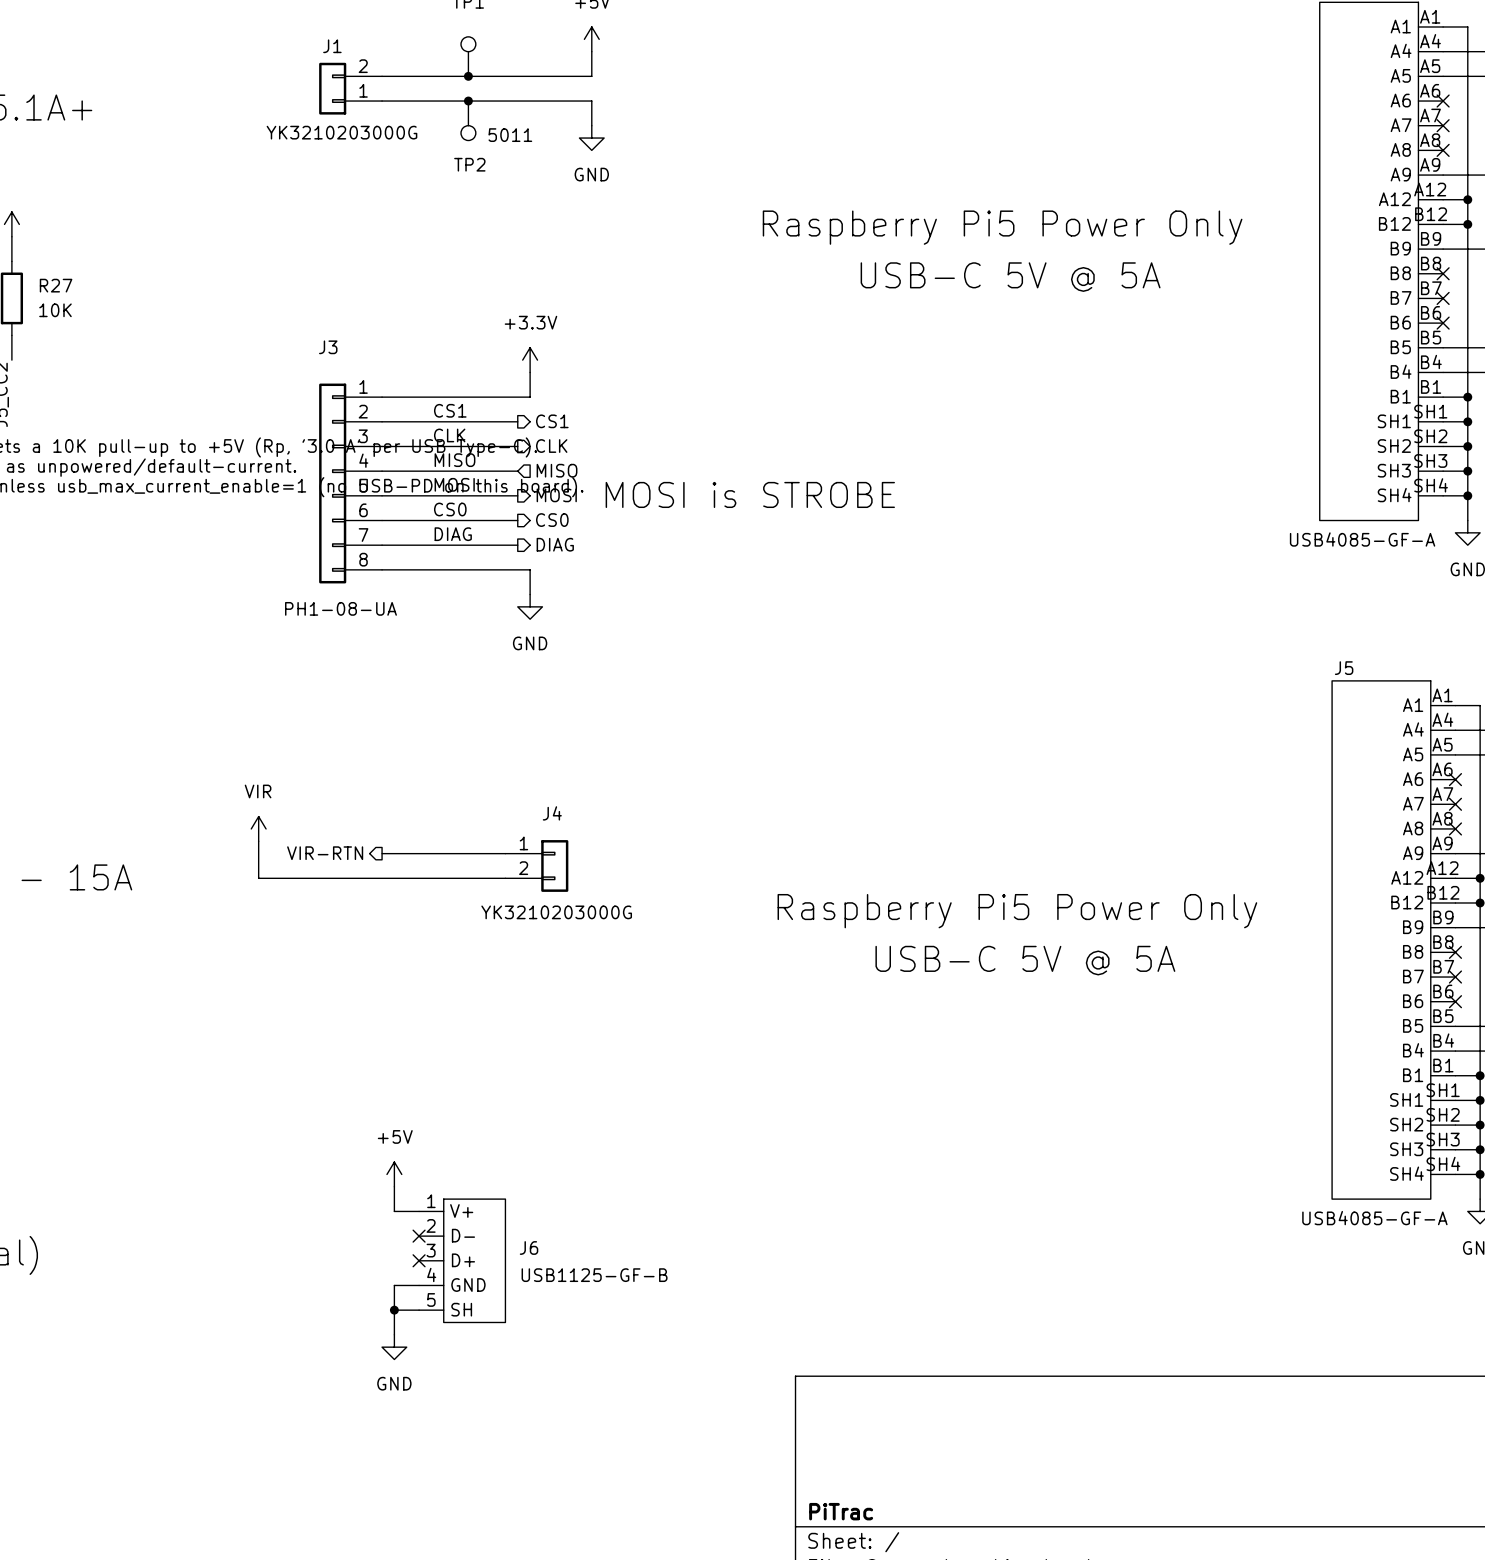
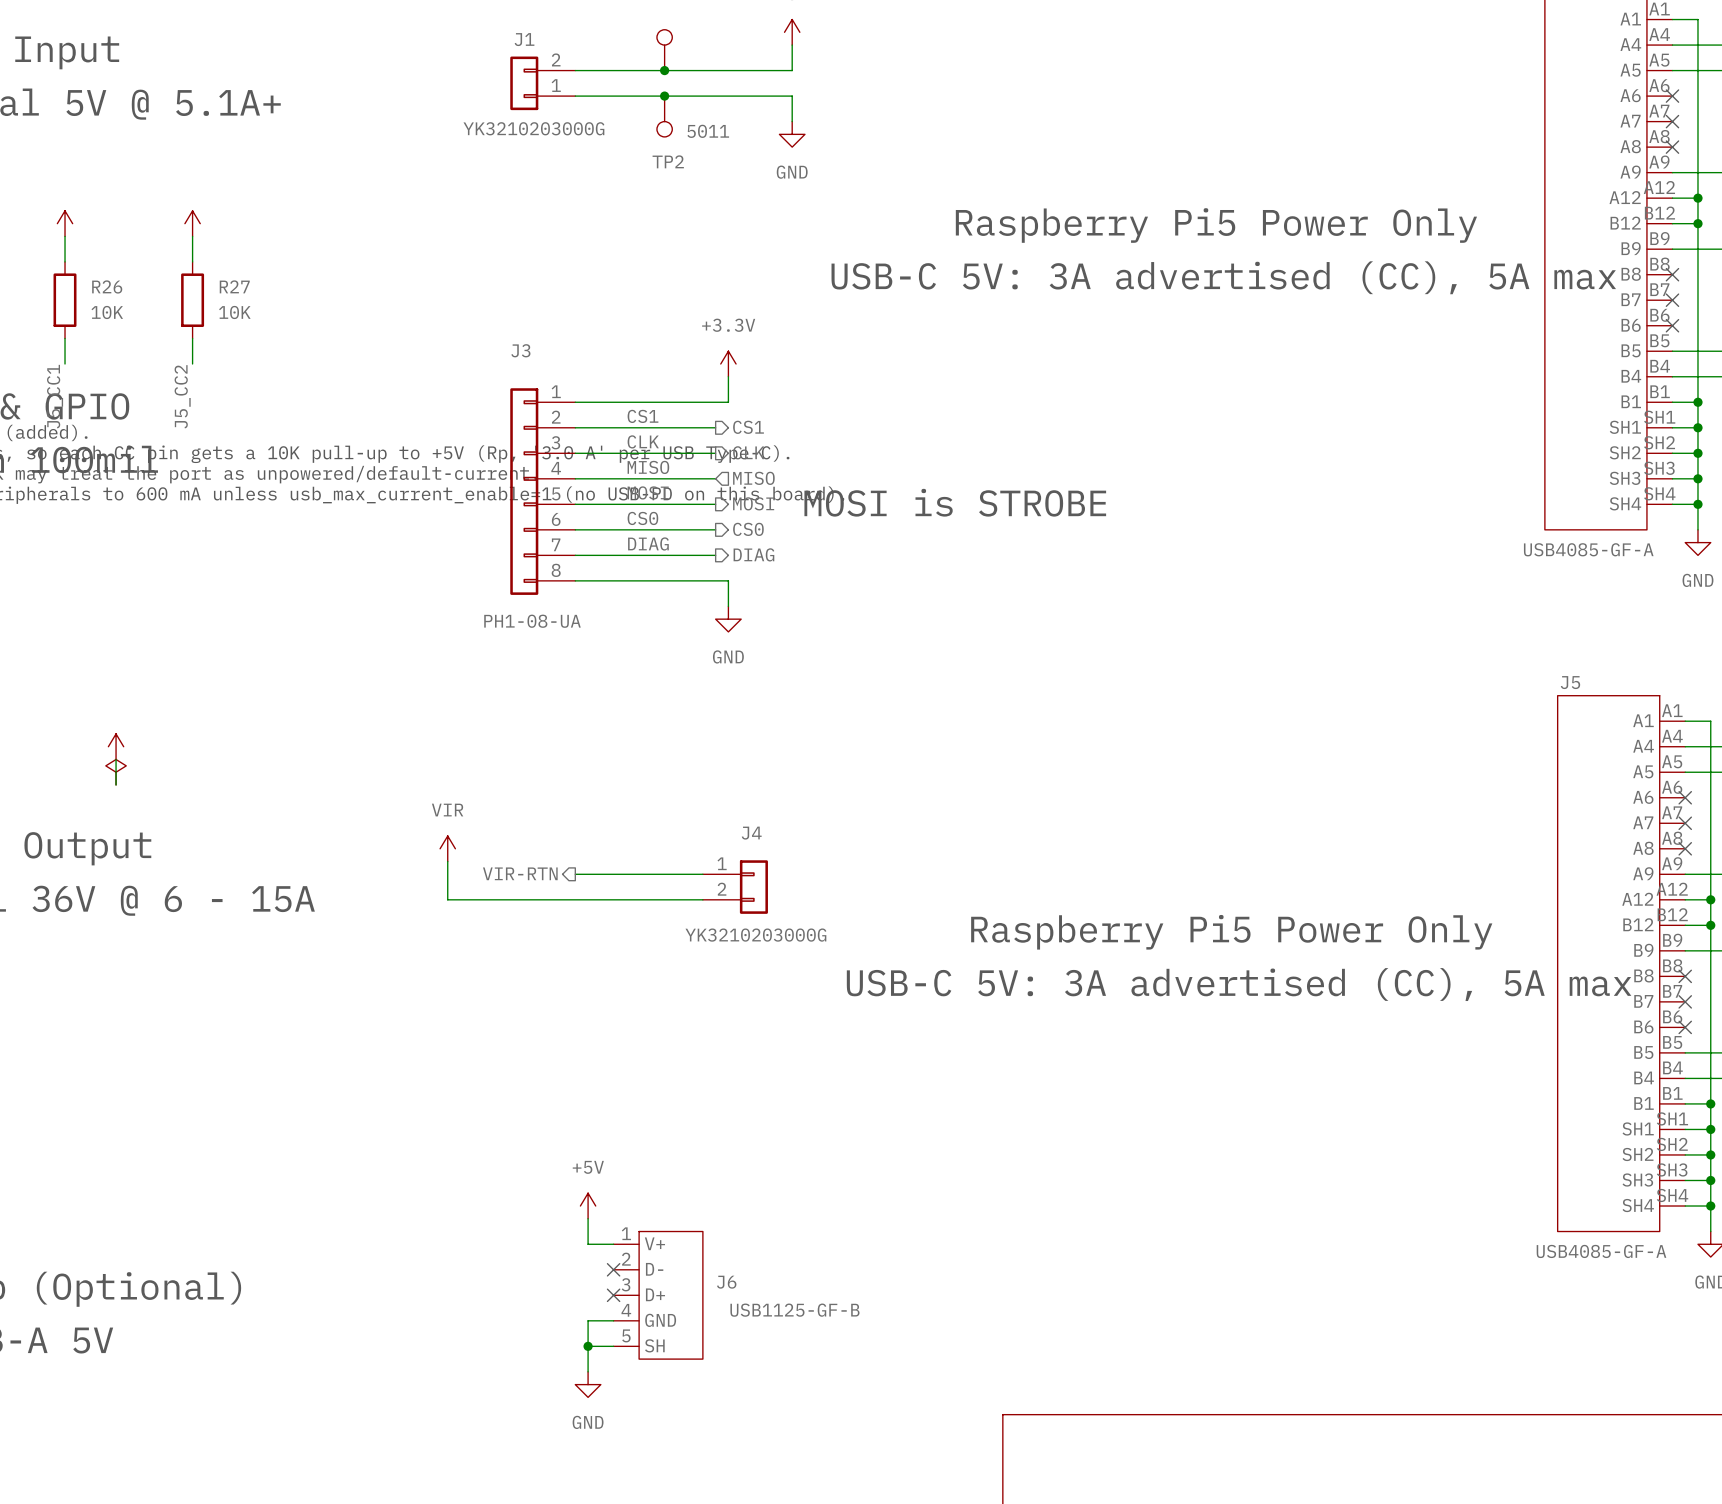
text: USB-C 5V @ 5A (1010, 277) -> USB-C 5V: 3A advertised (CC), 5A max (1223, 277)
text: USB-C 5V @ 5A (1025, 960) -> USB-C 5V: 3A advertised (CC), 5A max (1239, 984)

